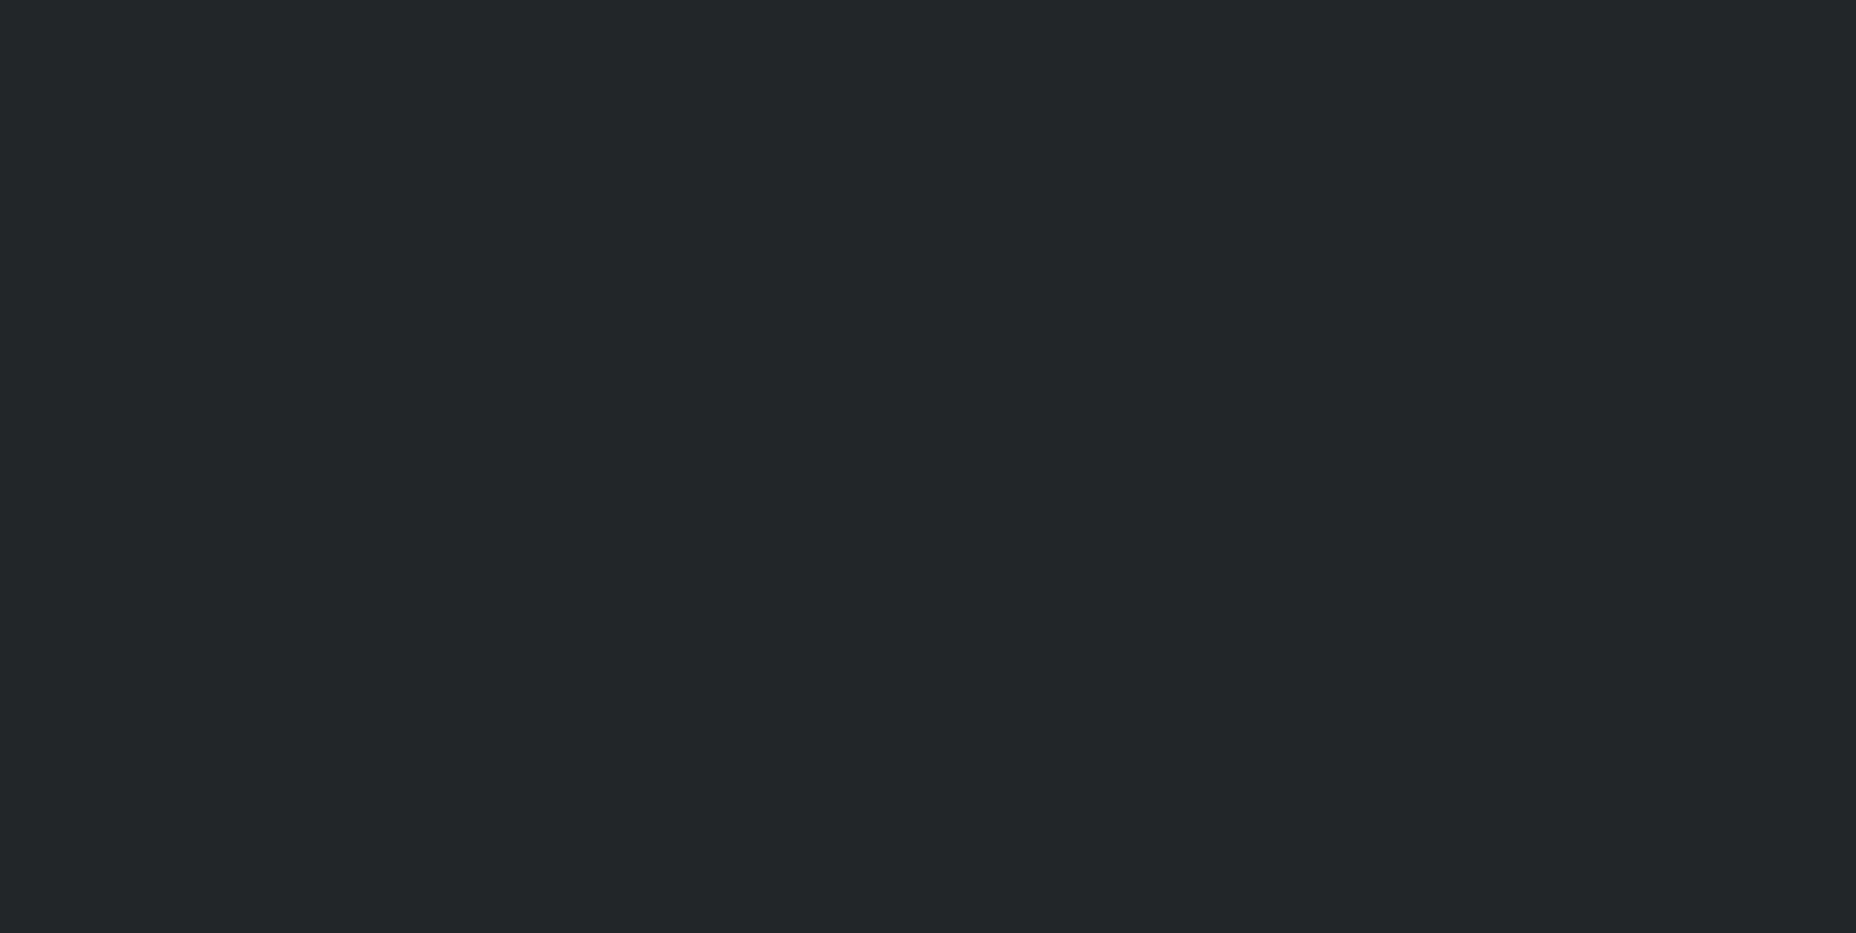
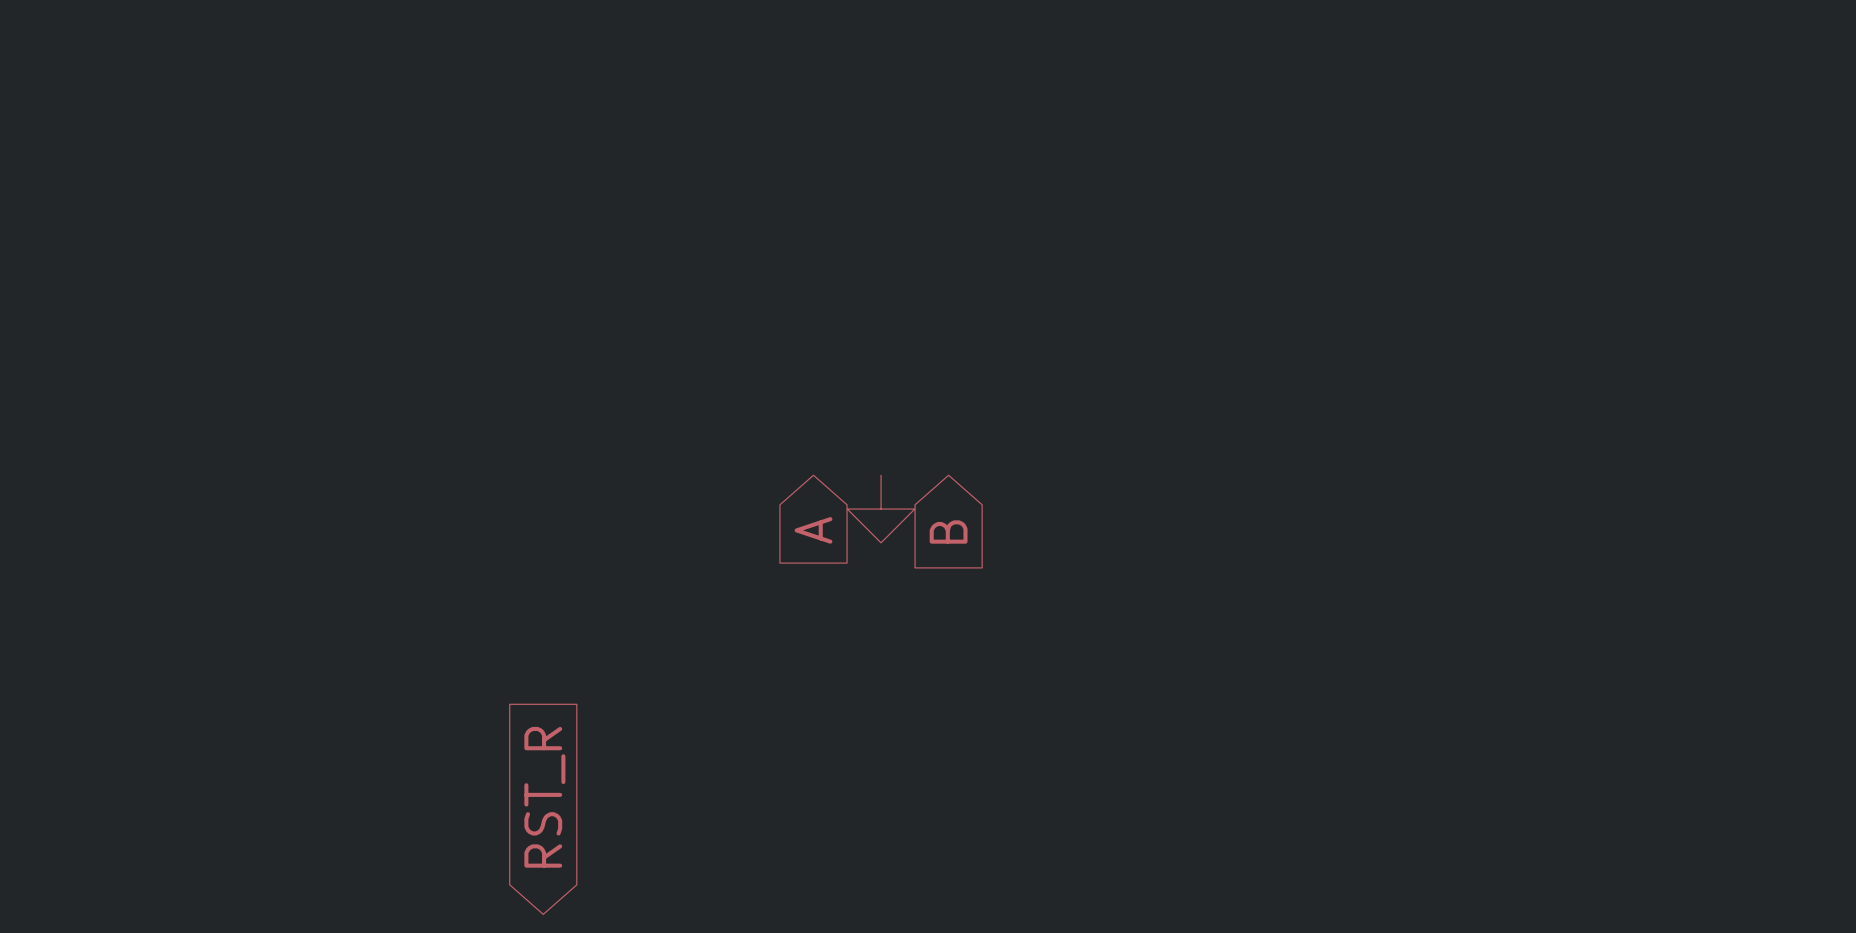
power symbol: none -> (881, 509)
global label: none -> A (813, 530)
global label: none -> B (948, 532)
global label: none -> RST_R (544, 797)

